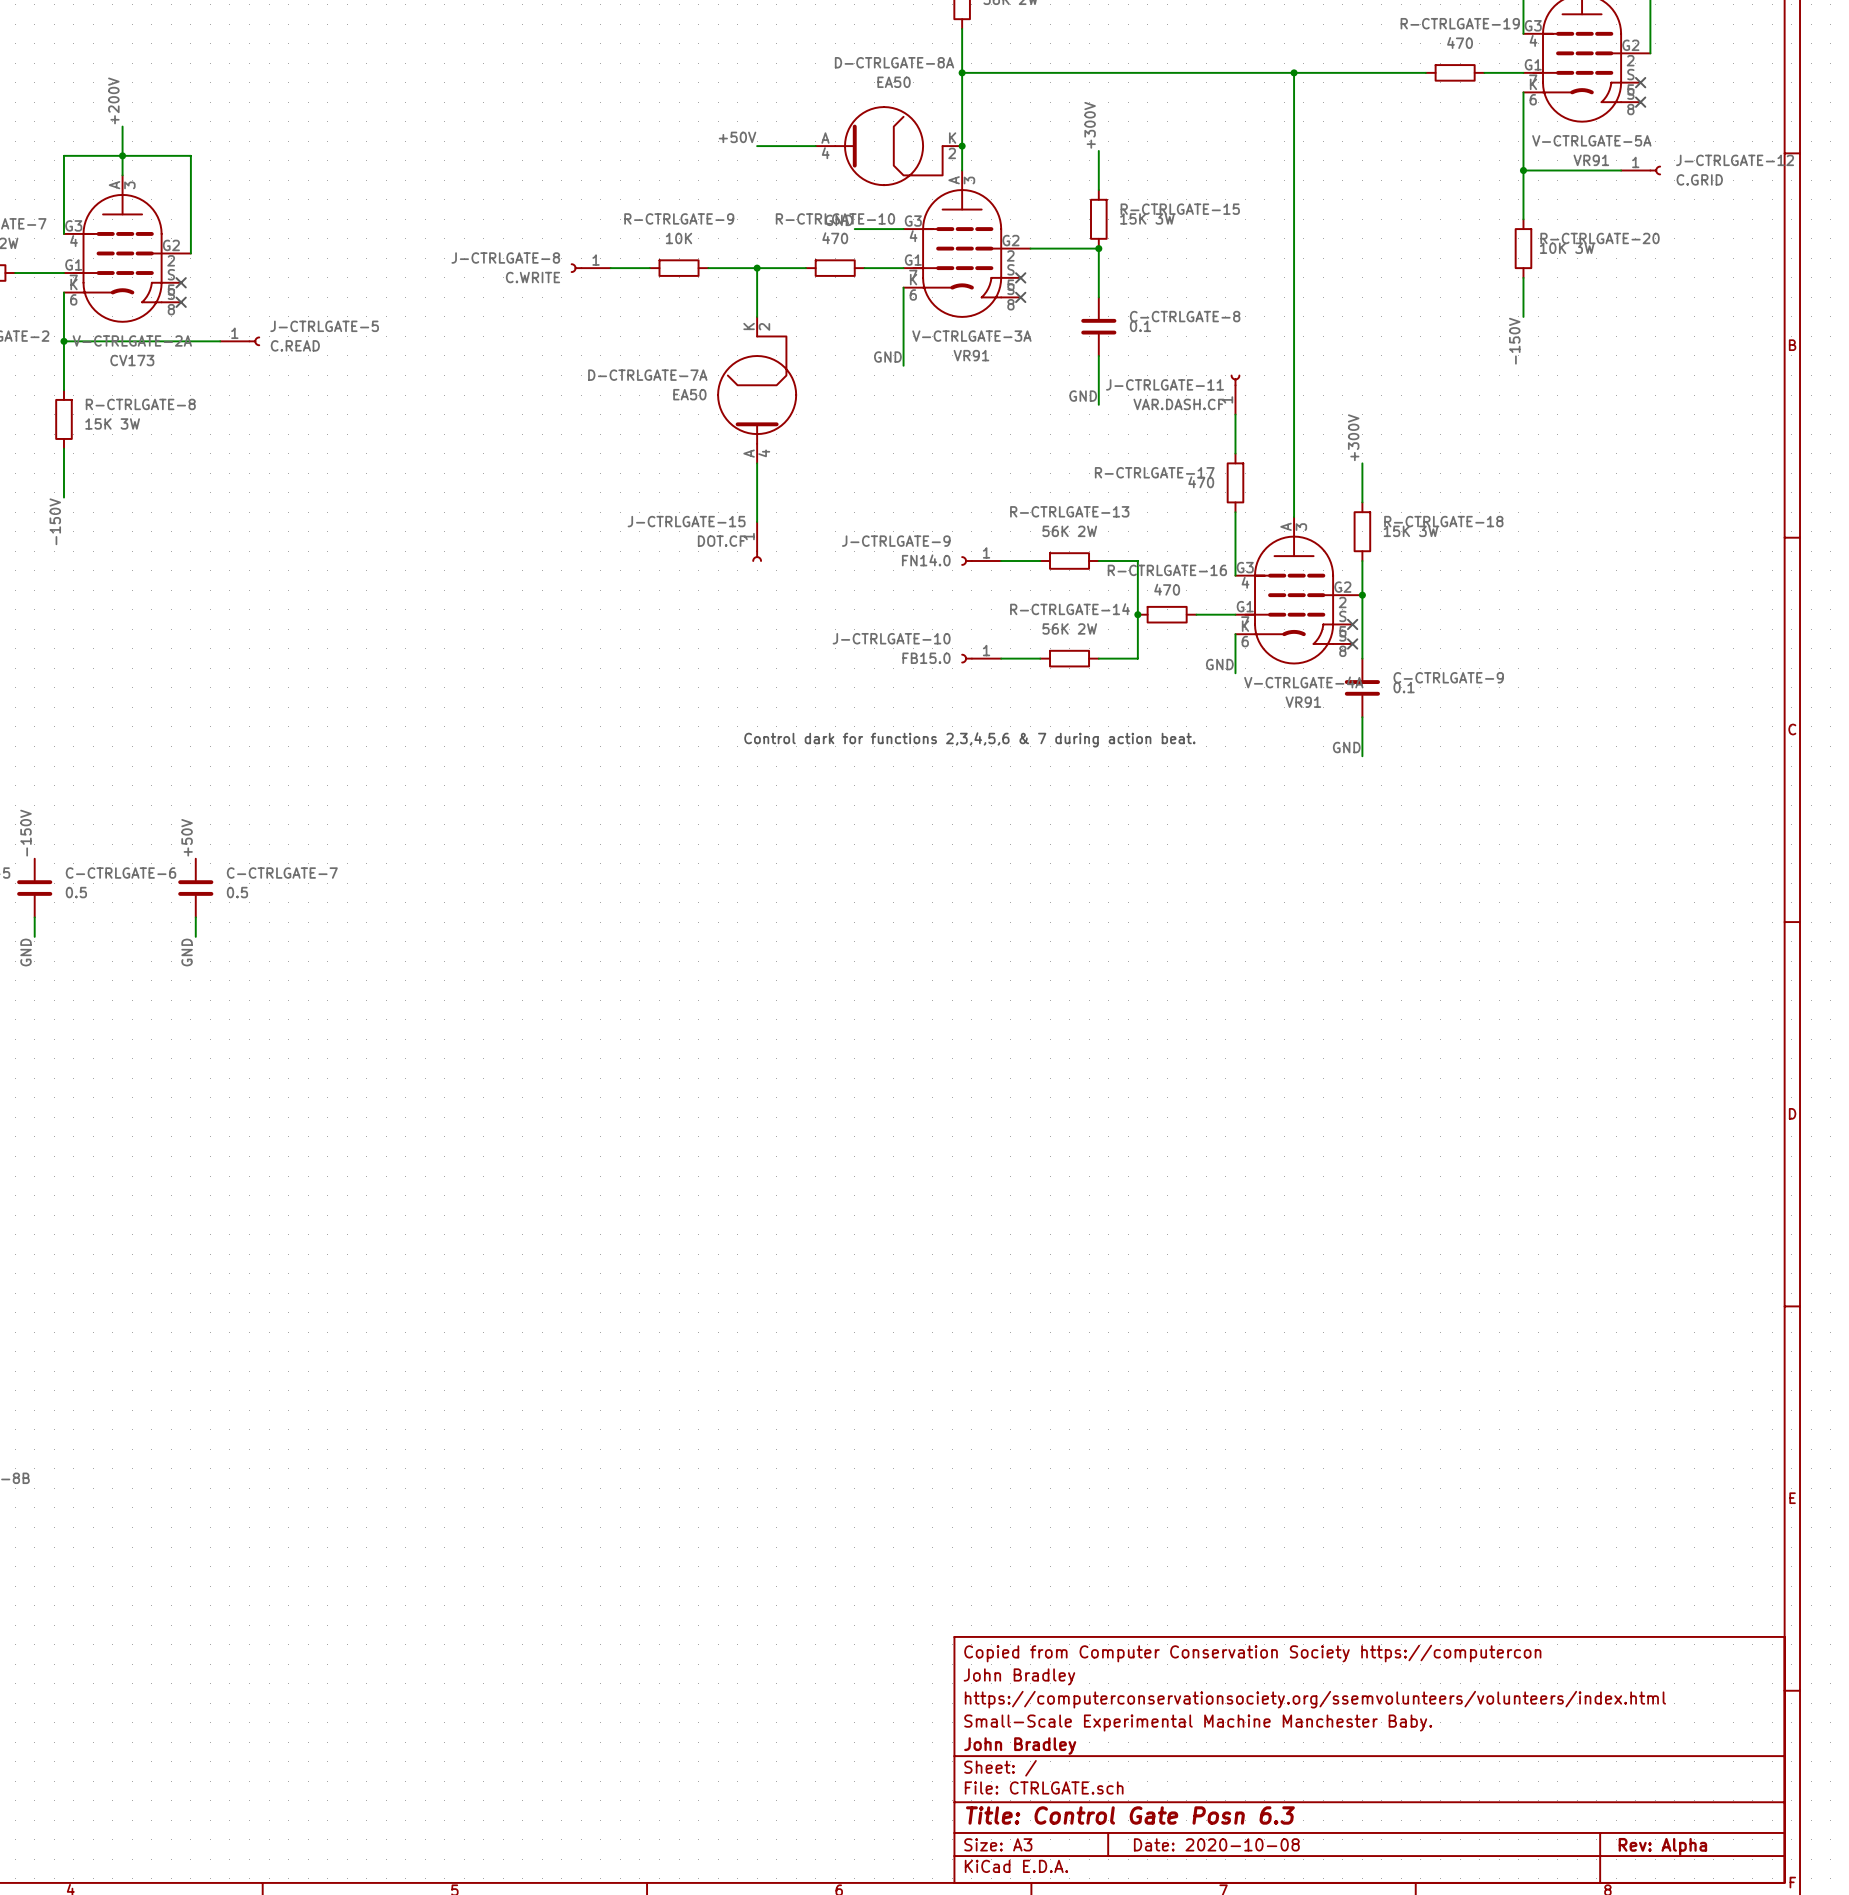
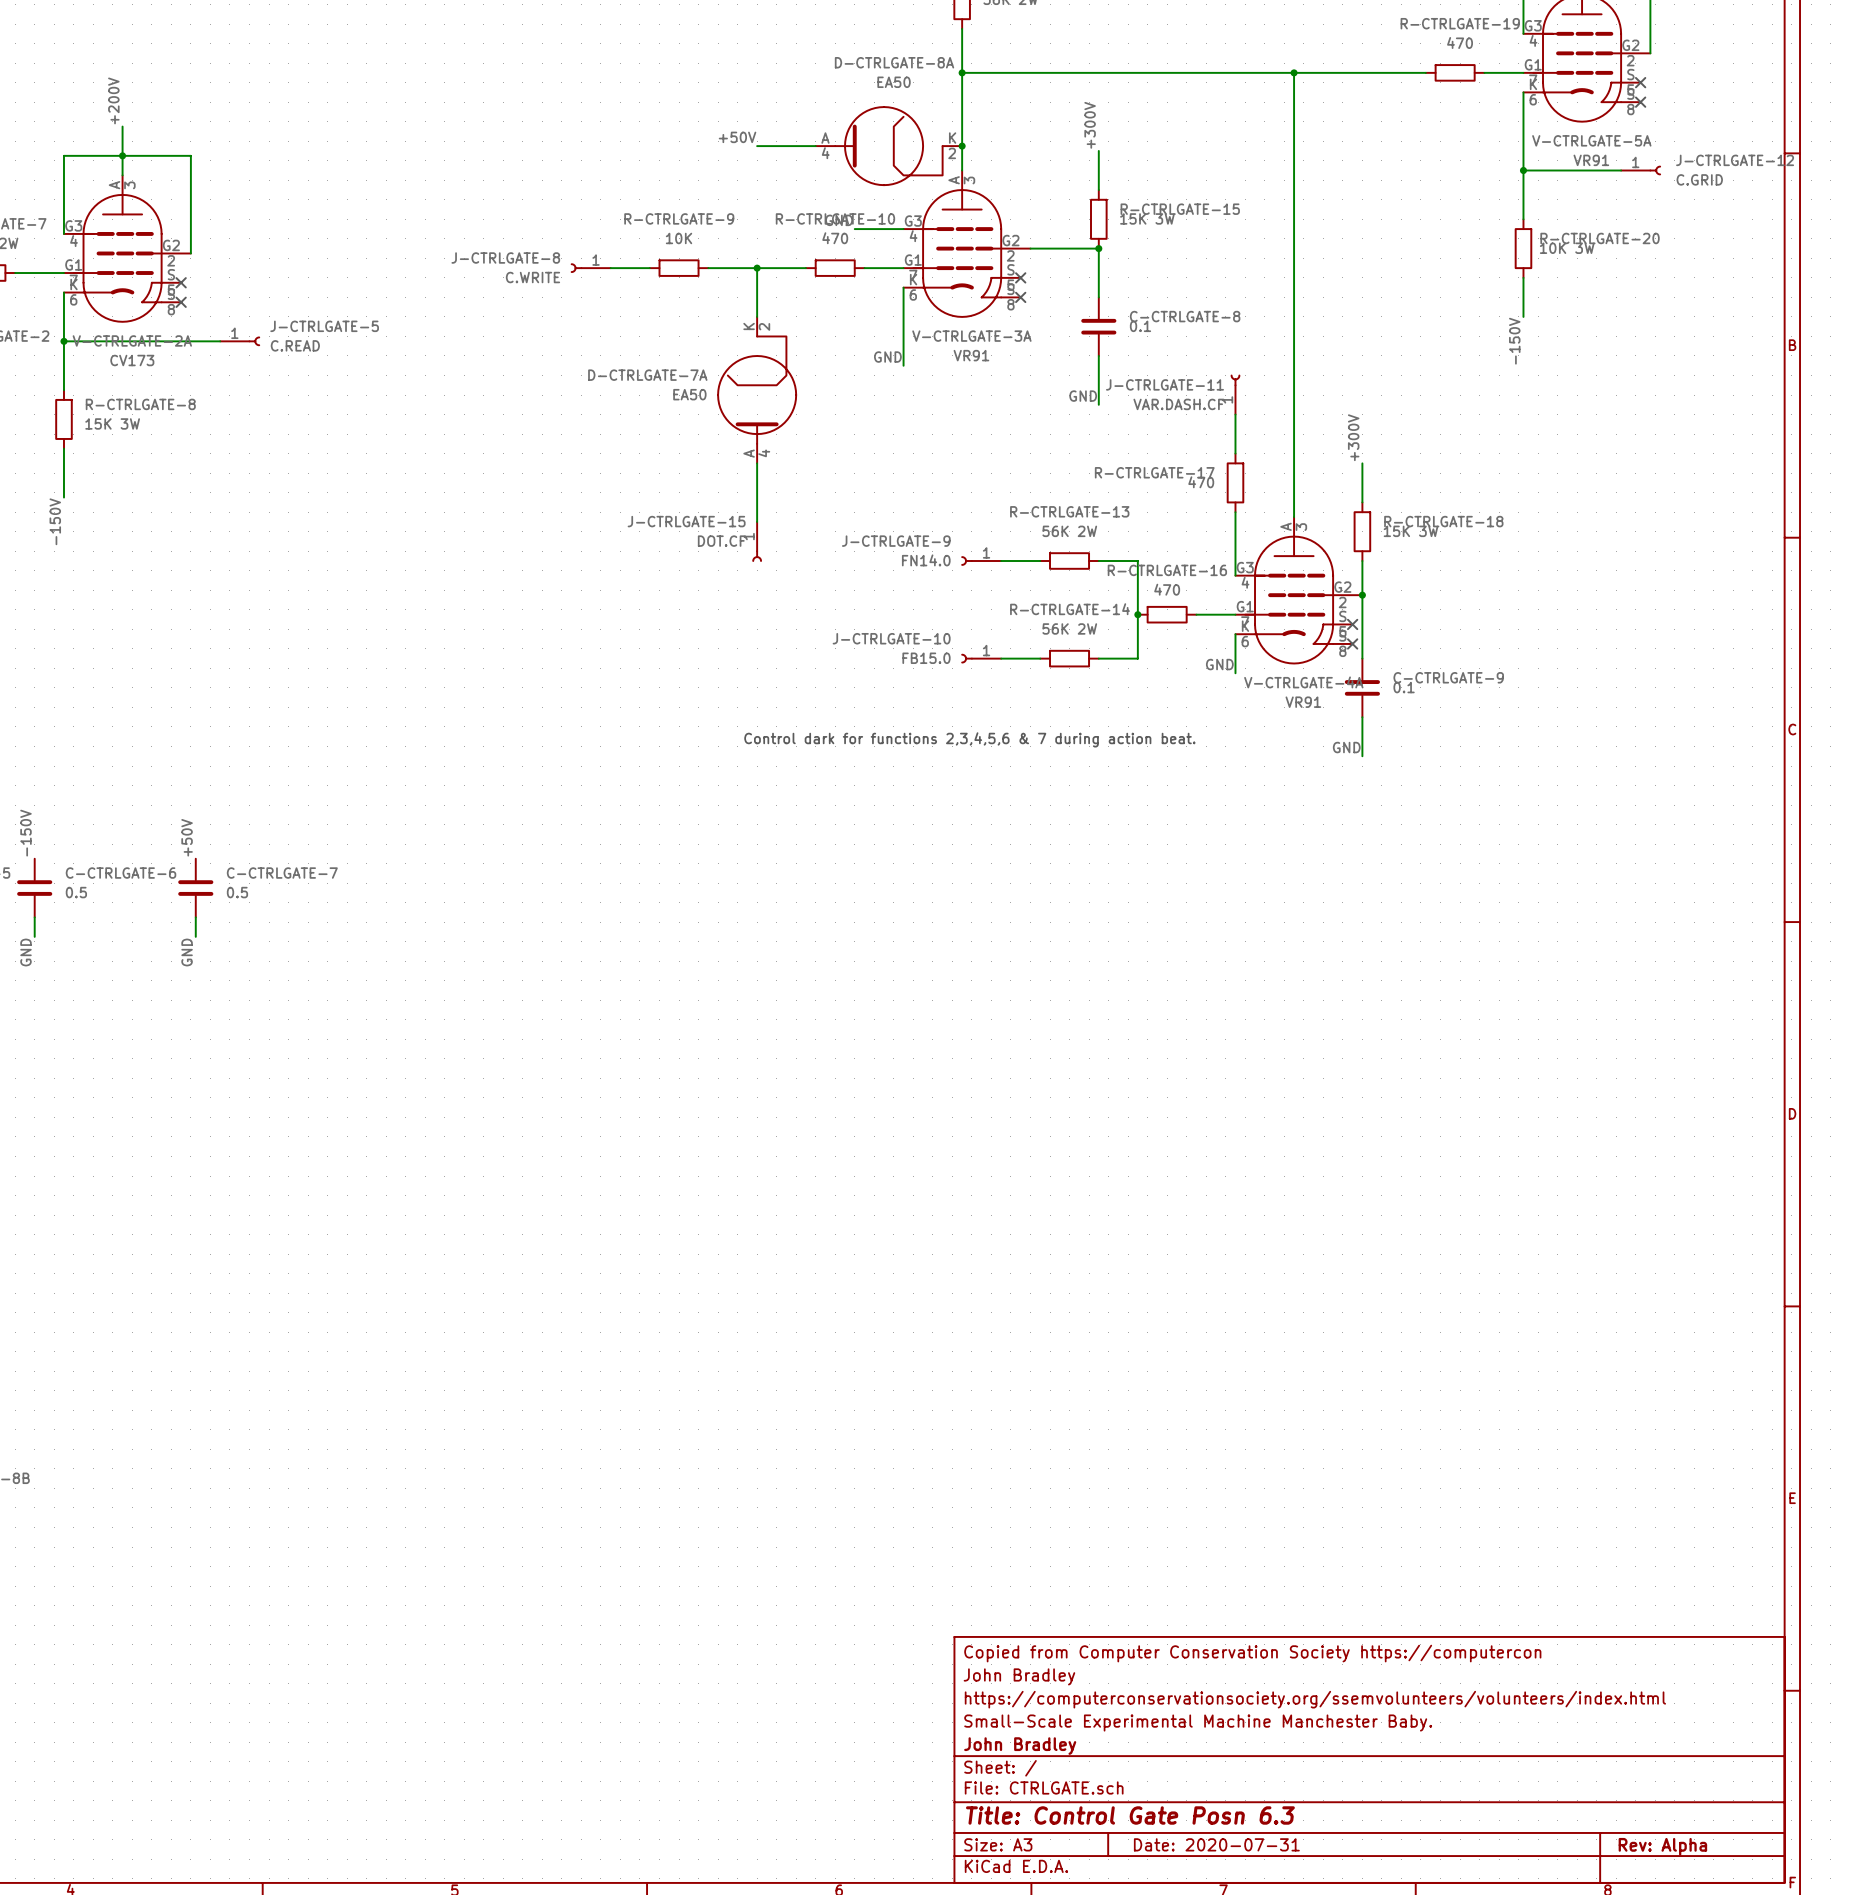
title block: Date: 2020-10-08 (1216, 1844) -> Date: 2020-07-31 (1216, 1844)

